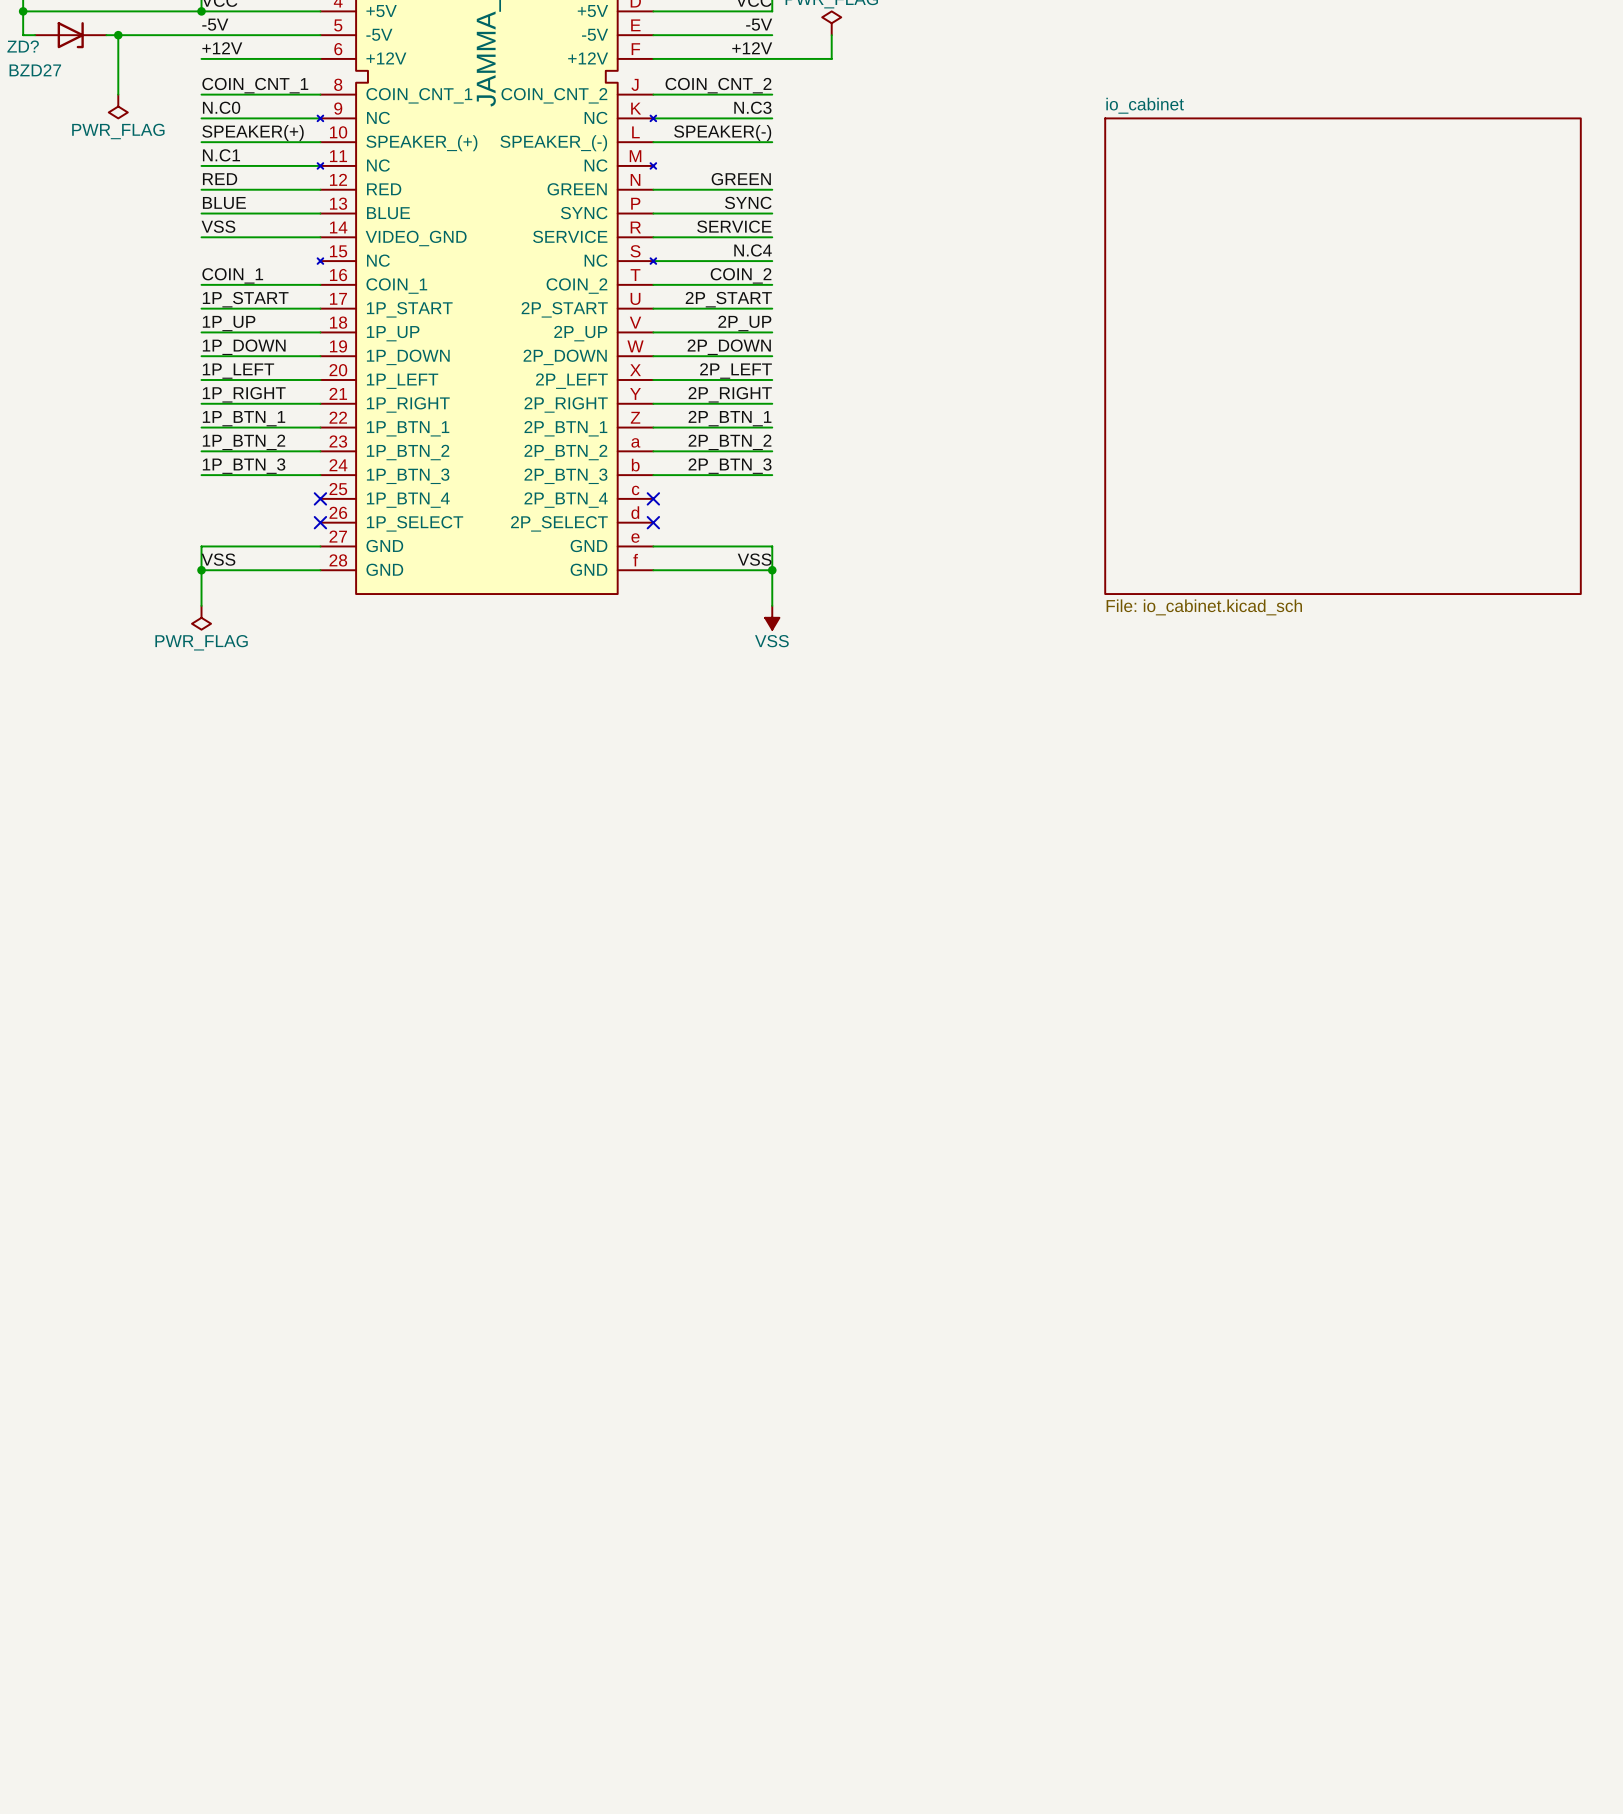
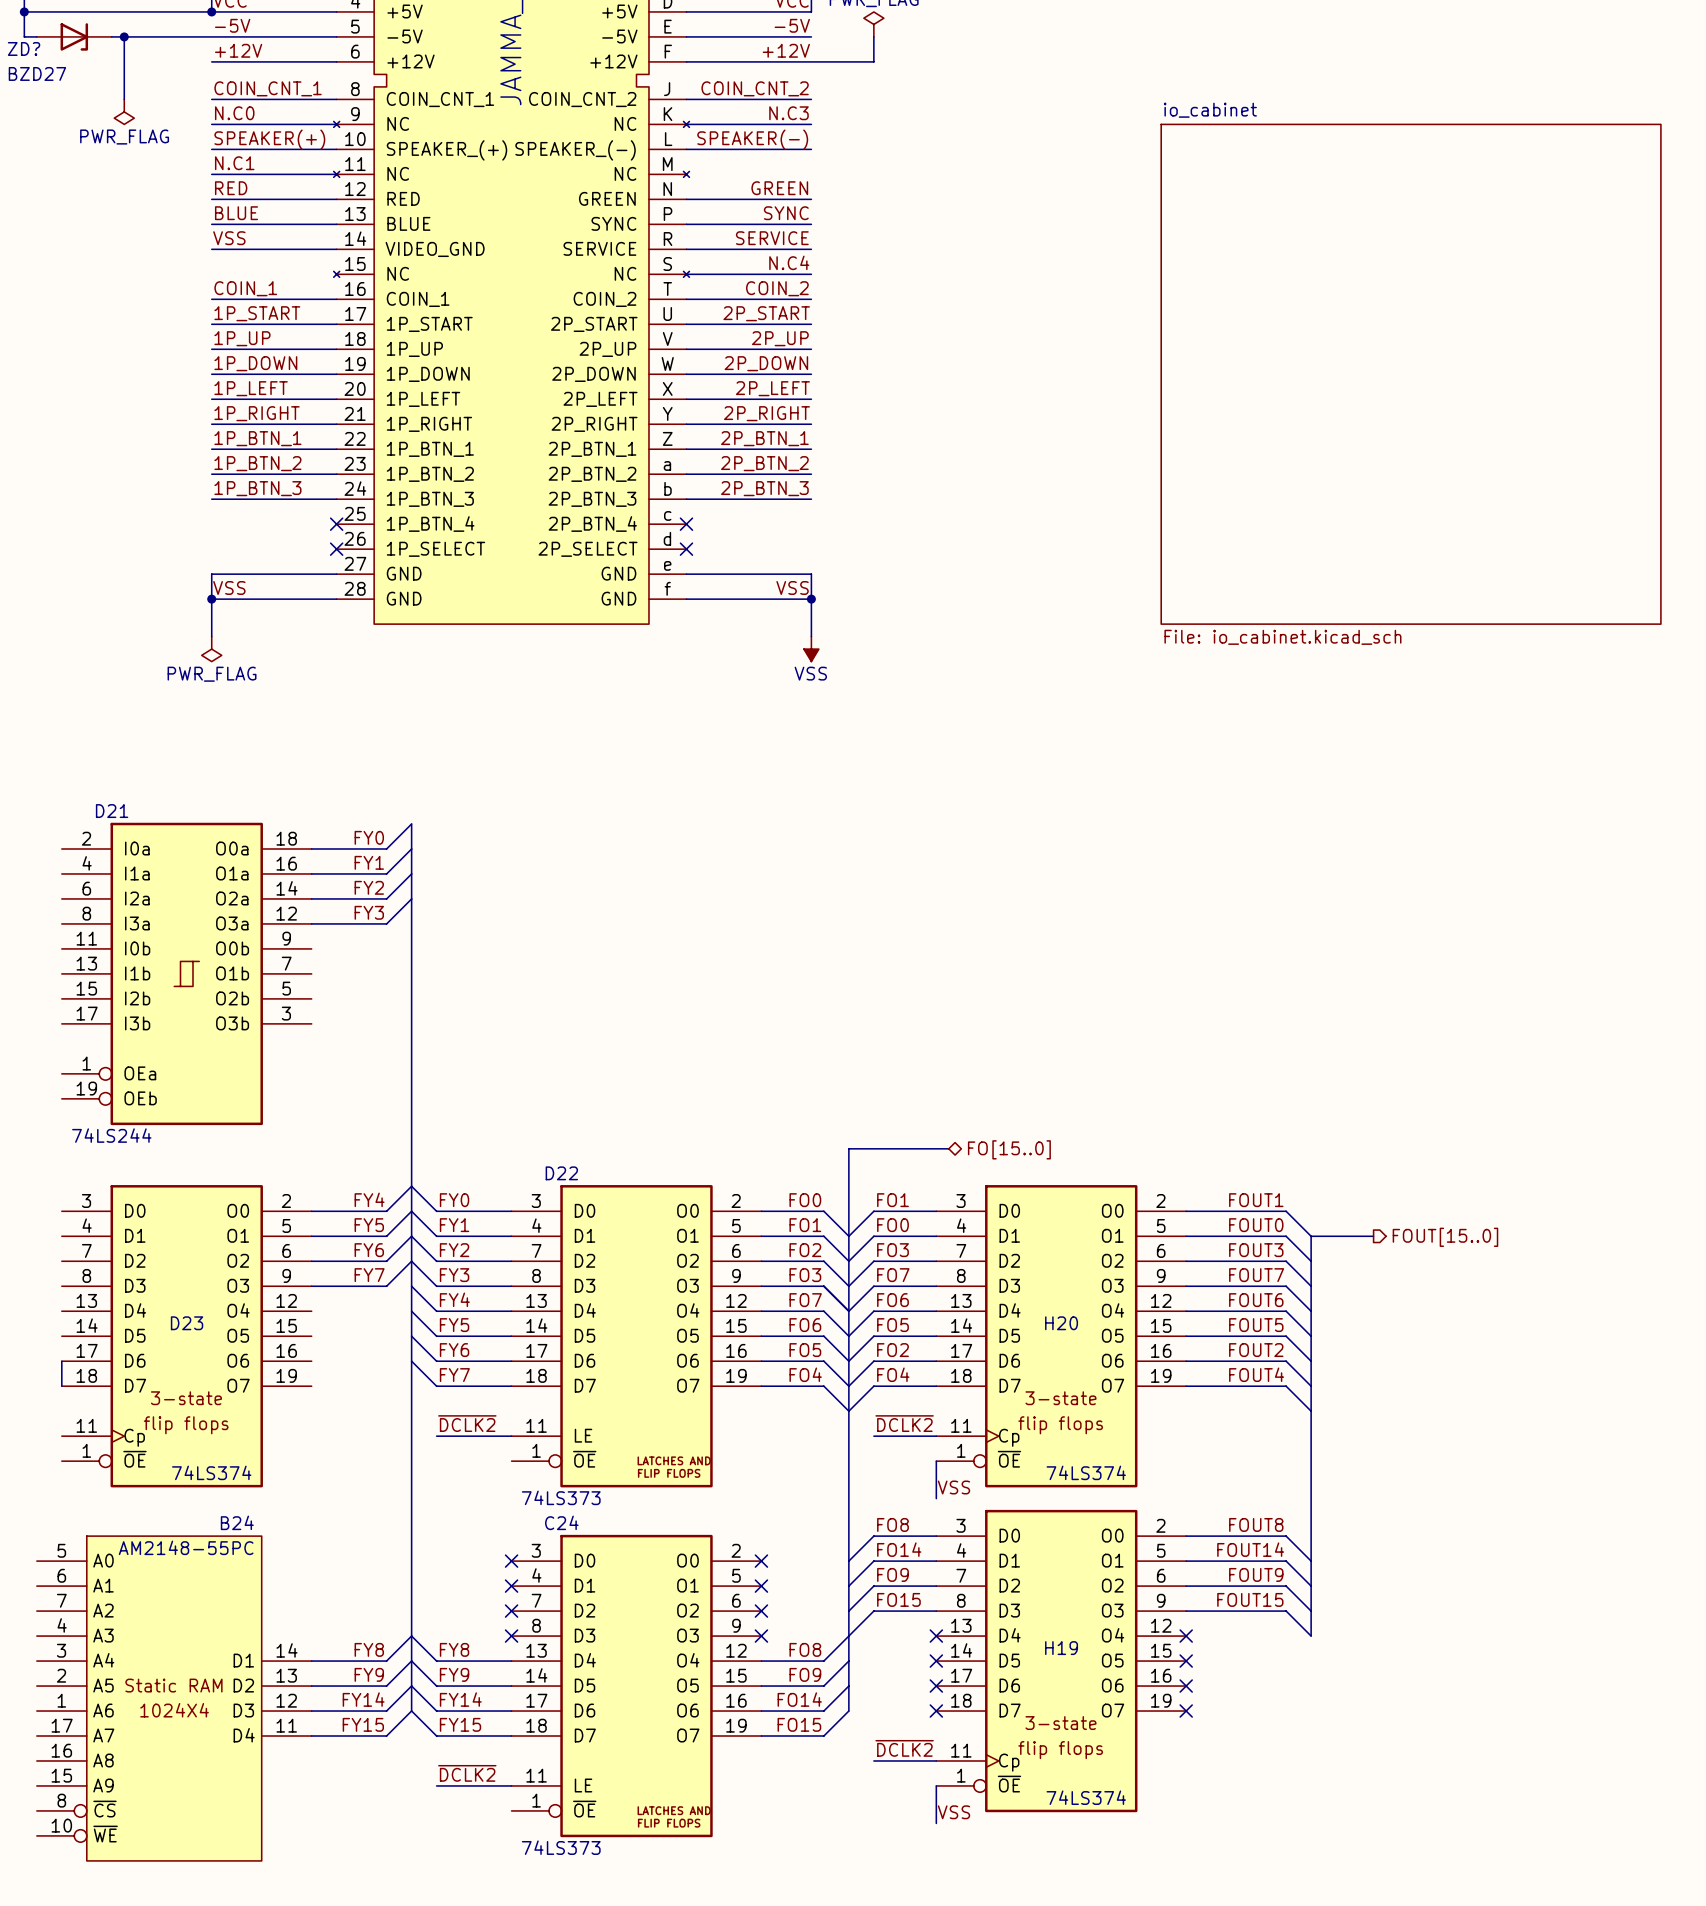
wire: none -> (411, 824) (386, 848) (311, 848)
bus: none -> (411, 824) (411, 1711)
label: none -> FY0 (369, 837)
wire: none -> (411, 848) (386, 873) (311, 873)
label: none -> FY1 (369, 862)
wire: none -> (411, 873) (386, 898) (311, 898)
label: none -> FY2 (369, 887)
wire: none -> (411, 898) (386, 923) (311, 923)
label: none -> FY3 (369, 912)
D21: none -> 74LS244 (186, 973)
bus: none -> (948, 1148) (848, 1148) (848, 1711)
hierarchical label: none -> FO[15..0] (1009, 1149)
label: none -> FY4 (369, 1199)
label: none -> FY0 (454, 1200)
label: none -> FO0 (805, 1200)
label: none -> FO1 (892, 1200)
label: none -> FOUT1 (1256, 1200)
wire: none -> (311, 1211) (386, 1211) (411, 1186) (436, 1211) (511, 1211)
wire: none -> (761, 1211) (823, 1211) (848, 1236) (873, 1211) (936, 1211)
wire: none -> (1186, 1211) (1286, 1211) (1311, 1236)
label: none -> FY5 (369, 1225)
label: none -> FY1 (454, 1225)
label: none -> FO1 (805, 1225)
label: none -> FO0 (892, 1225)
label: none -> FOUT0 (1256, 1225)
wire: none -> (311, 1236) (386, 1236) (411, 1211) (436, 1236) (511, 1236)
wire: none -> (761, 1236) (823, 1236) (848, 1261) (873, 1236) (936, 1236)
wire: none -> (1186, 1236) (1286, 1236) (1311, 1261)
bus: none -> (1373, 1236) (1311, 1236) (1311, 1636)
hierarchical label: none -> FOUT[15..0] (1445, 1237)
label: none -> FY6 (369, 1250)
label: none -> FY2 (454, 1250)
label: none -> FO2 (805, 1250)
label: none -> FO3 (892, 1250)
label: none -> FOUT3 (1256, 1250)
wire: none -> (311, 1261) (386, 1261) (411, 1236) (436, 1261) (511, 1261)
wire: none -> (761, 1261) (823, 1261) (848, 1286) (873, 1261) (936, 1261)
wire: none -> (1186, 1261) (1286, 1261) (1311, 1286)
label: none -> FY7 (369, 1275)
label: none -> FY3 (454, 1275)
label: none -> FO3 (805, 1275)
label: none -> FO7 (893, 1275)
label: none -> FOUT7 (1256, 1275)
wire: none -> (311, 1286) (386, 1286) (411, 1261) (436, 1286) (511, 1286)
wire: none -> (411, 1286) (436, 1311) (511, 1311)
wire: none -> (761, 1286) (823, 1286) (848, 1311) (873, 1286) (936, 1286)
wire: none -> (1186, 1286) (1286, 1286) (1311, 1311)
label: none -> FY4 (454, 1299)
label: none -> FO7 (805, 1300)
label: none -> FO6 (892, 1300)
label: none -> FOUT6 (1256, 1300)
wire: none -> (411, 1311) (436, 1336) (511, 1336)
wire: none -> (761, 1311) (823, 1311) (848, 1336) (873, 1311) (936, 1311)
wire: none -> (1186, 1311) (1286, 1311) (1311, 1336)
label: none -> FY5 (454, 1325)
label: none -> FO6 (805, 1325)
label: none -> FO5 (892, 1325)
label: none -> FOUT5 (1256, 1325)
D23: none -> 74LS374 (186, 1336)
wire: none -> (411, 1336) (436, 1361) (511, 1361)
D22: none -> 74LS373 (636, 1336)
wire: none -> (761, 1336) (823, 1336) (848, 1361) (873, 1336) (936, 1336)
H20: none -> 74LS374 (1061, 1336)
wire: none -> (1186, 1336) (1286, 1336) (1311, 1361)
label: none -> FY6 (454, 1350)
label: none -> FO5 (805, 1350)
label: none -> FO2 (892, 1350)
label: none -> FOUT2 (1256, 1350)
wire: none -> (61, 1361) (61, 1386)
wire: none -> (411, 1361) (436, 1386) (511, 1386)
wire: none -> (761, 1361) (823, 1361) (848, 1386) (873, 1361) (936, 1361)
wire: none -> (1186, 1361) (1286, 1361) (1311, 1386)
label: none -> FY7 (454, 1375)
label: none -> FO4 (805, 1374)
label: none -> FO4 (893, 1374)
label: none -> FOUT4 (1256, 1374)
wire: none -> (761, 1386) (823, 1386) (848, 1411) (873, 1386) (936, 1386)
wire: none -> (1186, 1386) (1286, 1386) (1311, 1411)
label: none -> ~{DCLK2} (467, 1423)
label: none -> ~{DCLK2} (904, 1423)
wire: none -> (436, 1436) (511, 1436)
wire: none -> (873, 1436) (936, 1436)
wire: none -> (936, 1461) (936, 1498)
label: none -> VSS (953, 1487)
label: none -> FO8 (892, 1524)
label: none -> FOUT8 (1256, 1524)
wire: none -> (936, 1536) (873, 1536) (848, 1561)
wire: none -> (1186, 1536) (1286, 1536) (1311, 1561)
label: none -> FO14 (899, 1549)
label: none -> FOUT14 (1250, 1549)
no-connect mark: none -> (511, 1561)
no-connect mark: none -> (761, 1561)
wire: none -> (936, 1561) (873, 1561) (848, 1586)
wire: none -> (1186, 1561) (1286, 1561) (1311, 1586)
label: none -> FO9 (892, 1574)
label: none -> FOUT9 (1256, 1574)
no-connect mark: none -> (511, 1586)
no-connect mark: none -> (761, 1586)
wire: none -> (936, 1586) (873, 1586) (848, 1611)
wire: none -> (1186, 1586) (1286, 1586) (1311, 1611)
label: none -> FO15 (898, 1599)
label: none -> FOUT15 (1250, 1599)
no-connect mark: none -> (511, 1611)
no-connect mark: none -> (761, 1611)
wire: none -> (936, 1611) (873, 1611) (823, 1661) (761, 1661)
wire: none -> (1186, 1611) (1286, 1611) (1311, 1636)
no-connect mark: none -> (511, 1636)
no-connect mark: none -> (761, 1636)
no-connect mark: none -> (936, 1636)
no-connect mark: none -> (1186, 1636)
label: none -> FY8 (369, 1649)
label: none -> FY8 (454, 1649)
label: none -> FO8 (805, 1649)
wire: none -> (311, 1661) (386, 1661) (411, 1636) (436, 1661) (511, 1661)
wire: none -> (848, 1661) (823, 1686) (761, 1686)
no-connect mark: none -> (936, 1661)
H19: none -> 74LS374 (1061, 1661)
no-connect mark: none -> (1186, 1661)
label: none -> FY9 (369, 1674)
label: none -> FY9 (454, 1674)
label: none -> FO9 (805, 1674)
wire: none -> (311, 1686) (386, 1686) (411, 1661) (436, 1686) (511, 1686)
C24: none -> 74LS373 (636, 1686)
wire: none -> (848, 1686) (823, 1711) (761, 1711)
no-connect mark: none -> (936, 1686)
no-connect mark: none -> (1186, 1686)
B24: none -> AM2148-55PC (174, 1698)
label: none -> FY14 (363, 1699)
label: none -> FY14 (460, 1699)
label: none -> FO14 (799, 1699)
wire: none -> (311, 1711) (386, 1711) (411, 1686) (436, 1711) (511, 1711)
wire: none -> (848, 1711) (823, 1736) (761, 1736)
no-connect mark: none -> (936, 1711)
no-connect mark: none -> (1186, 1711)
label: none -> FY15 (363, 1724)
label: none -> FY15 (460, 1724)
label: none -> FO15 (799, 1724)
wire: none -> (311, 1736) (386, 1736) (411, 1711) (436, 1736) (511, 1736)
label: none -> ~{DCLK2} (904, 1748)
wire: none -> (873, 1760) (936, 1760)
label: none -> ~{DCLK2} (467, 1773)
wire: none -> (436, 1785) (511, 1785)
wire: none -> (936, 1785) (936, 1823)
label: none -> VSS (953, 1812)

